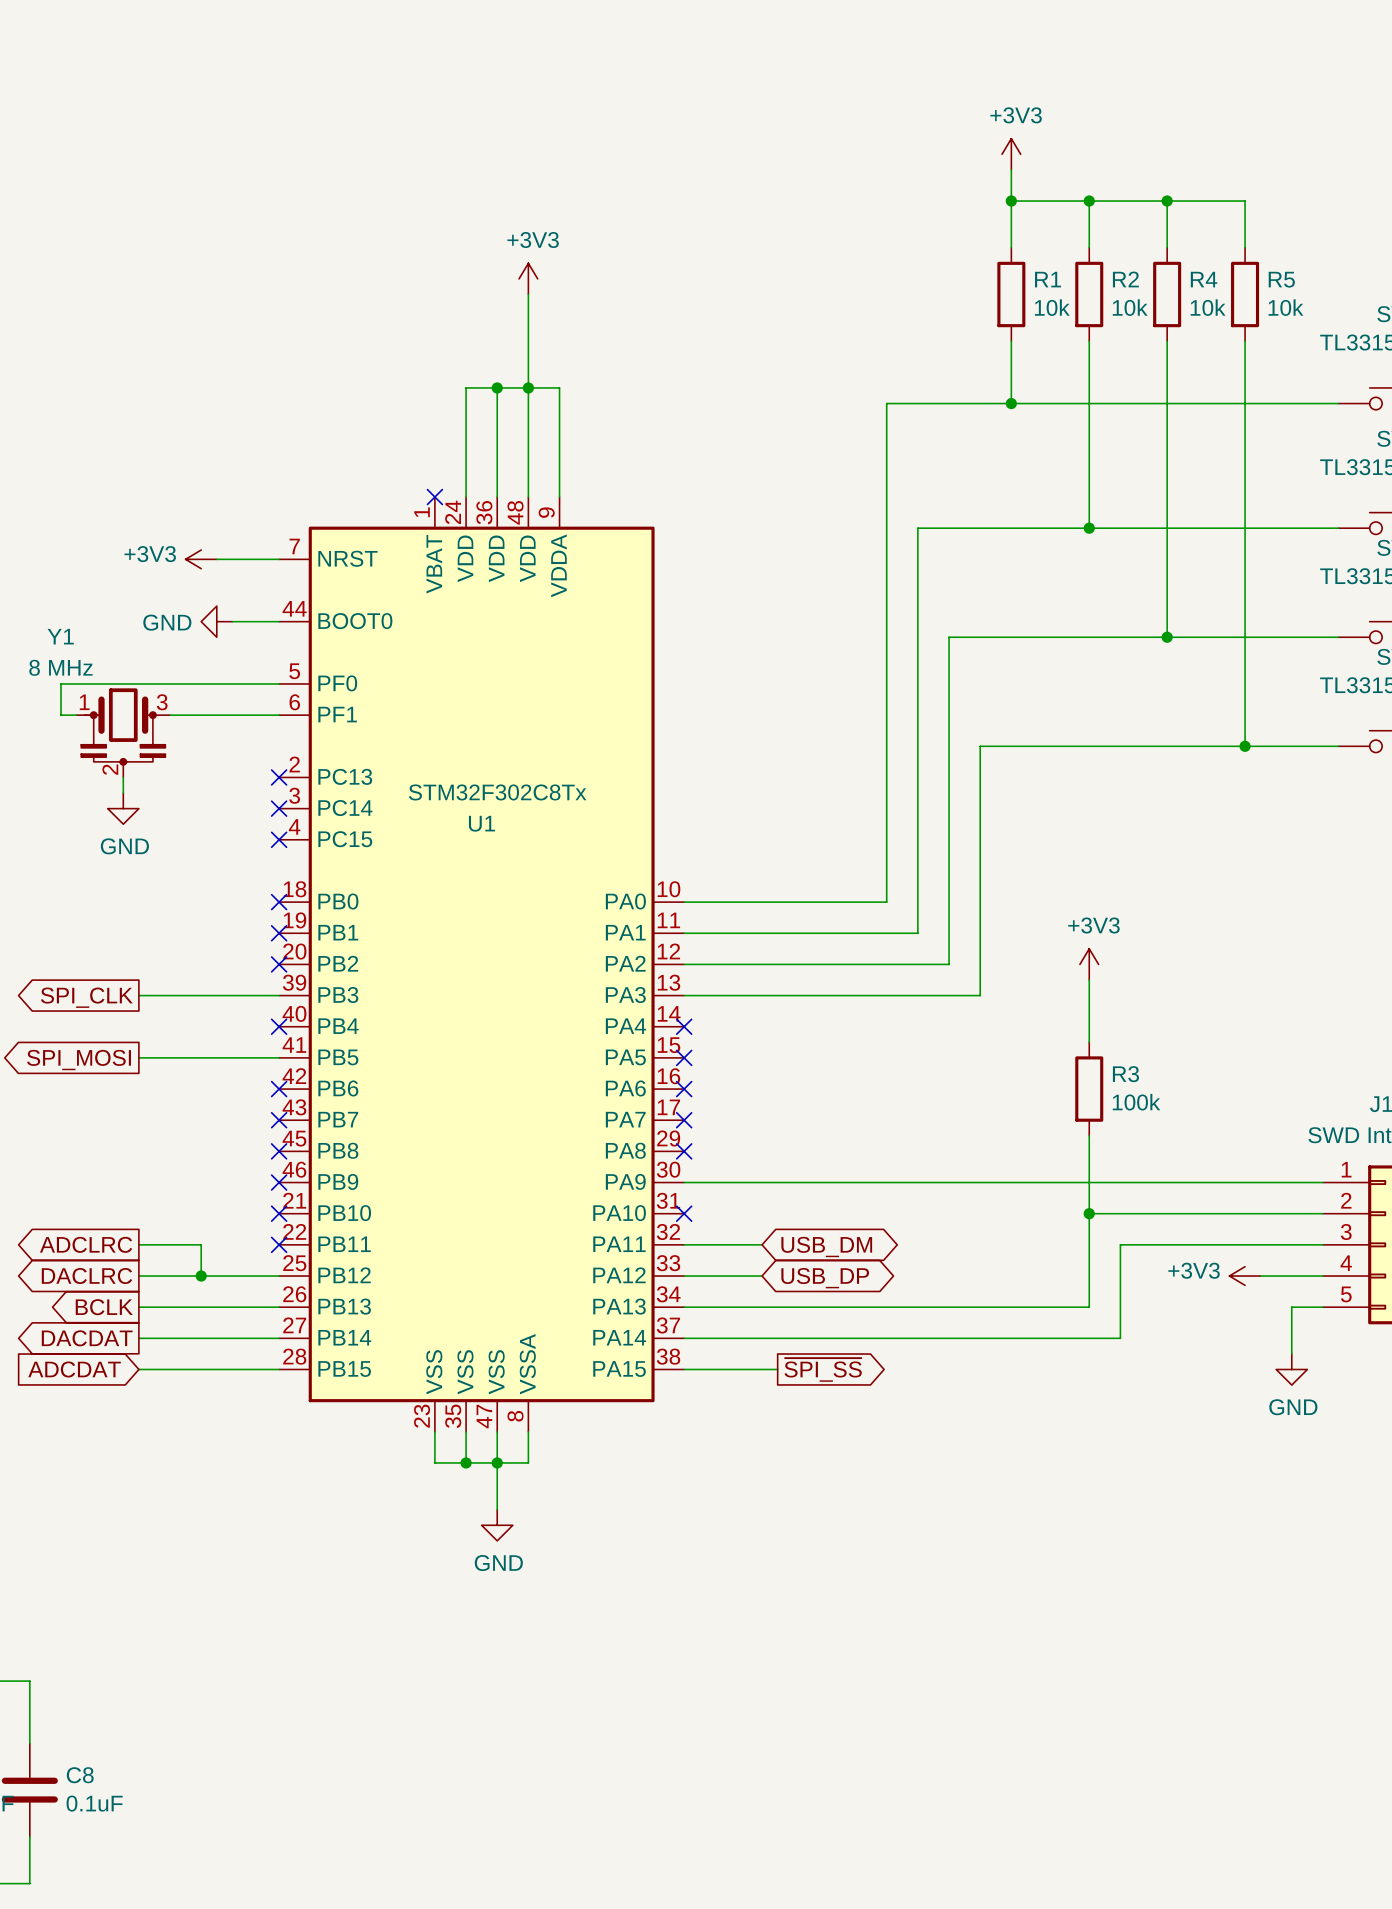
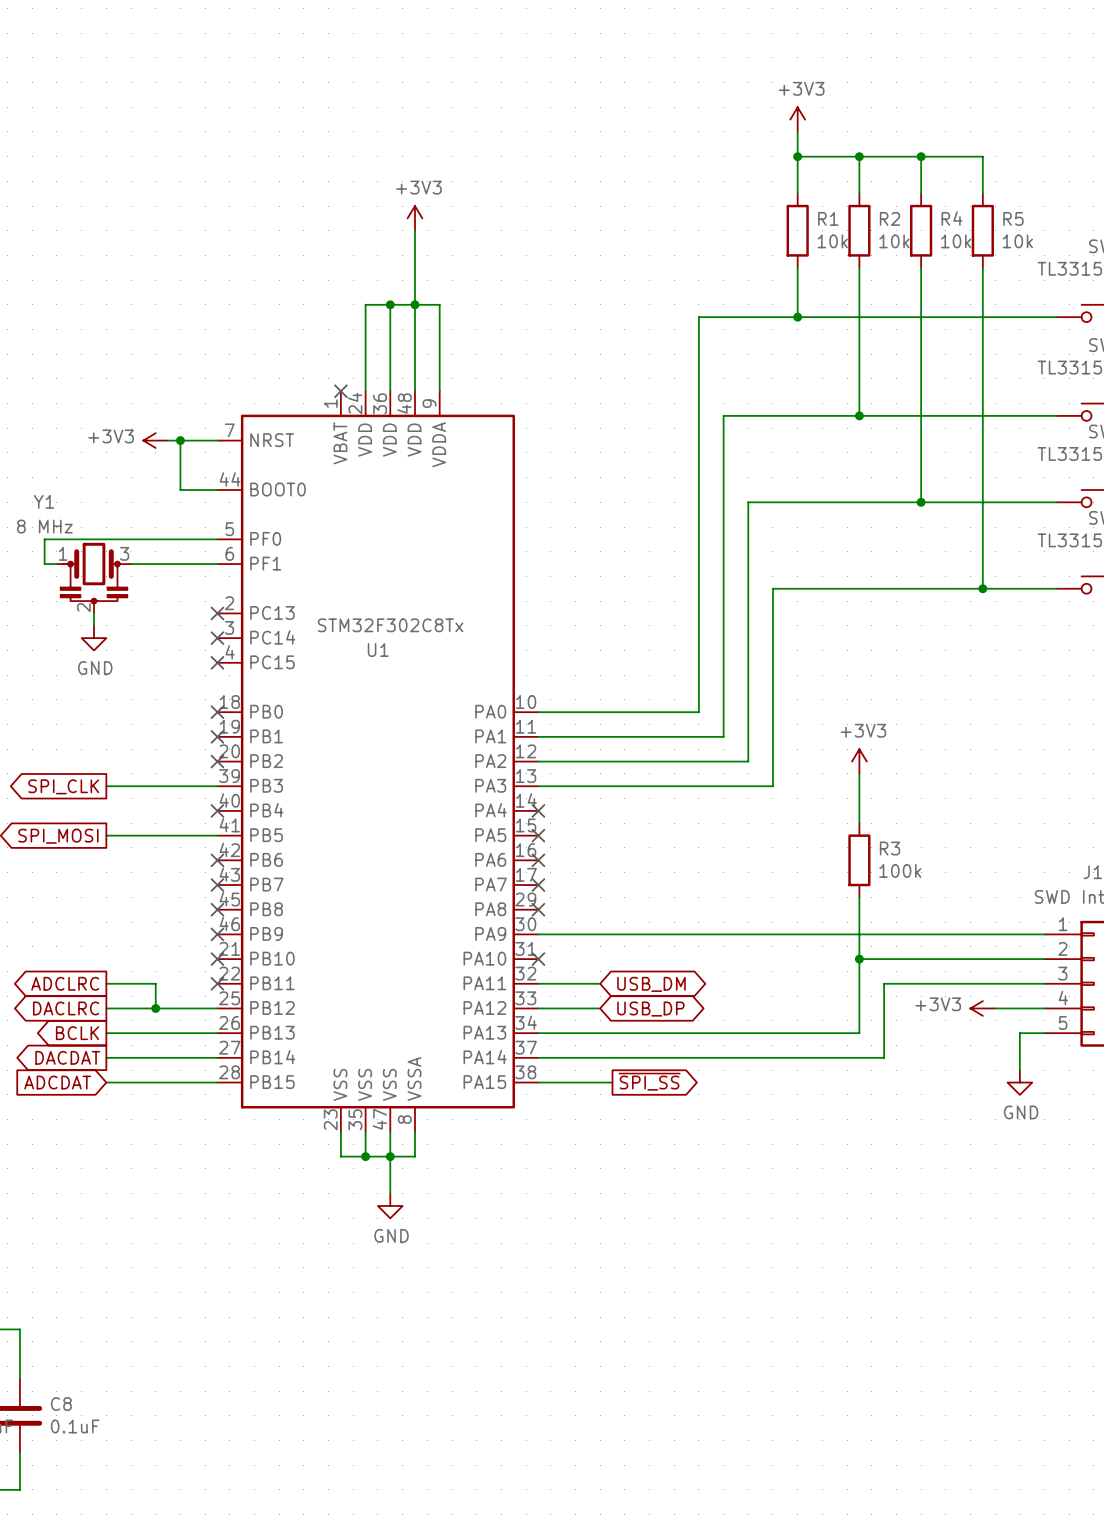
wire: none -> (180, 440) (180, 489)
junction: none -> (180, 440)
power symbol: GND (216, 621) -> none

